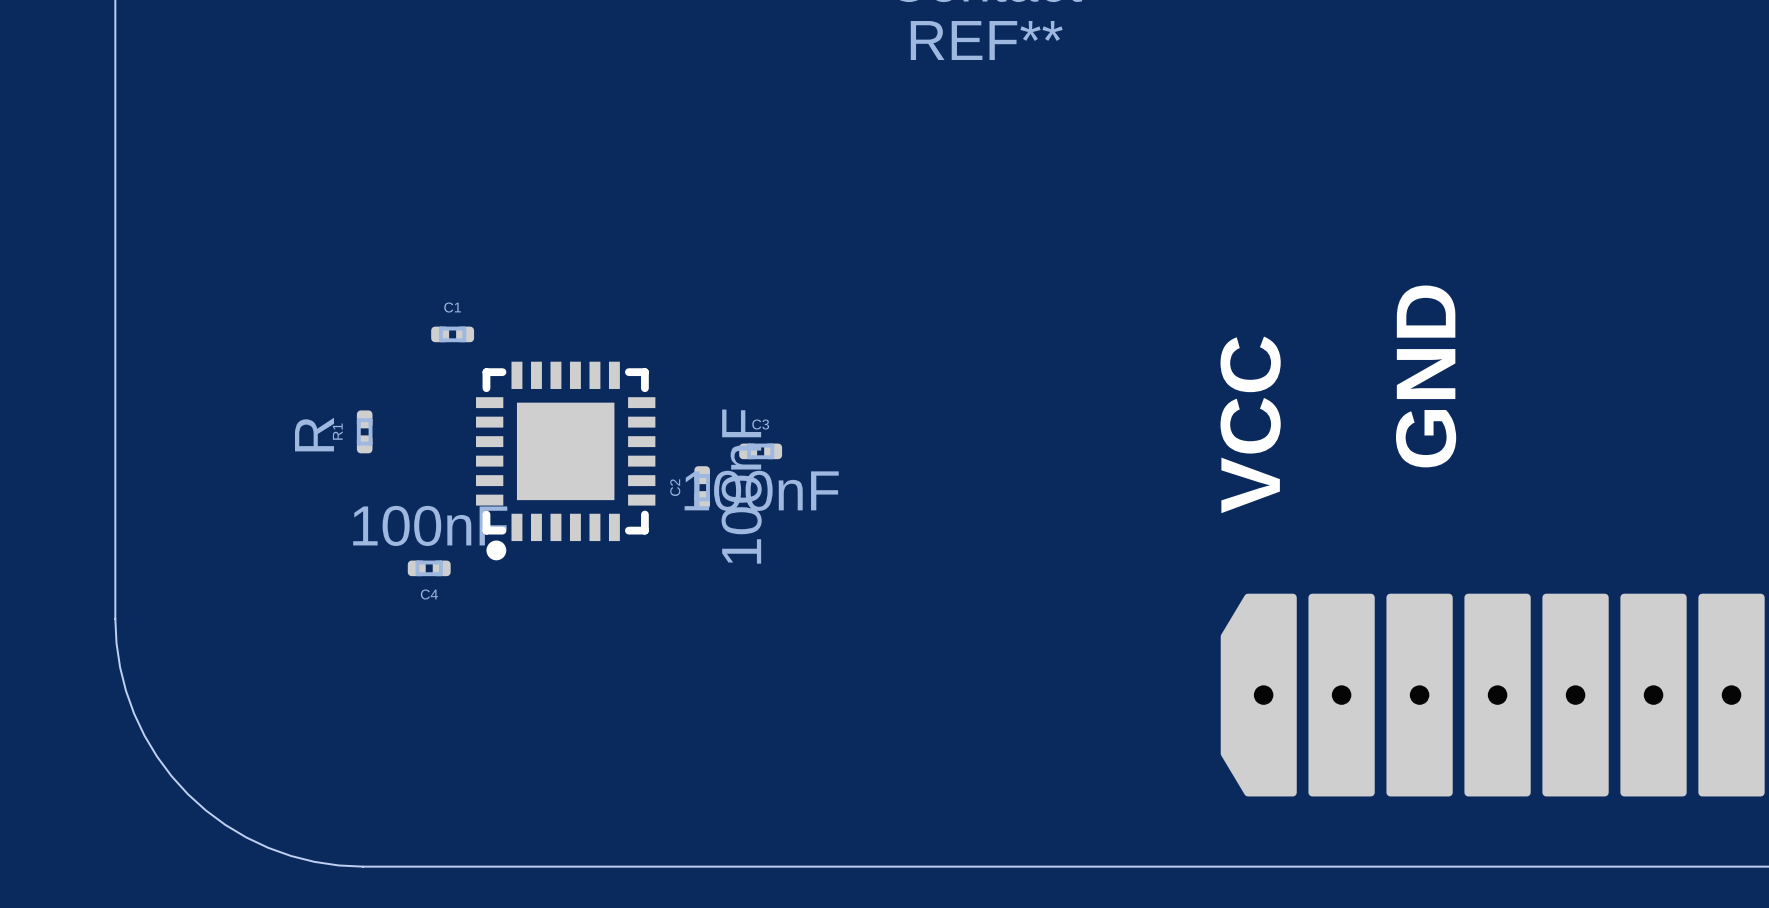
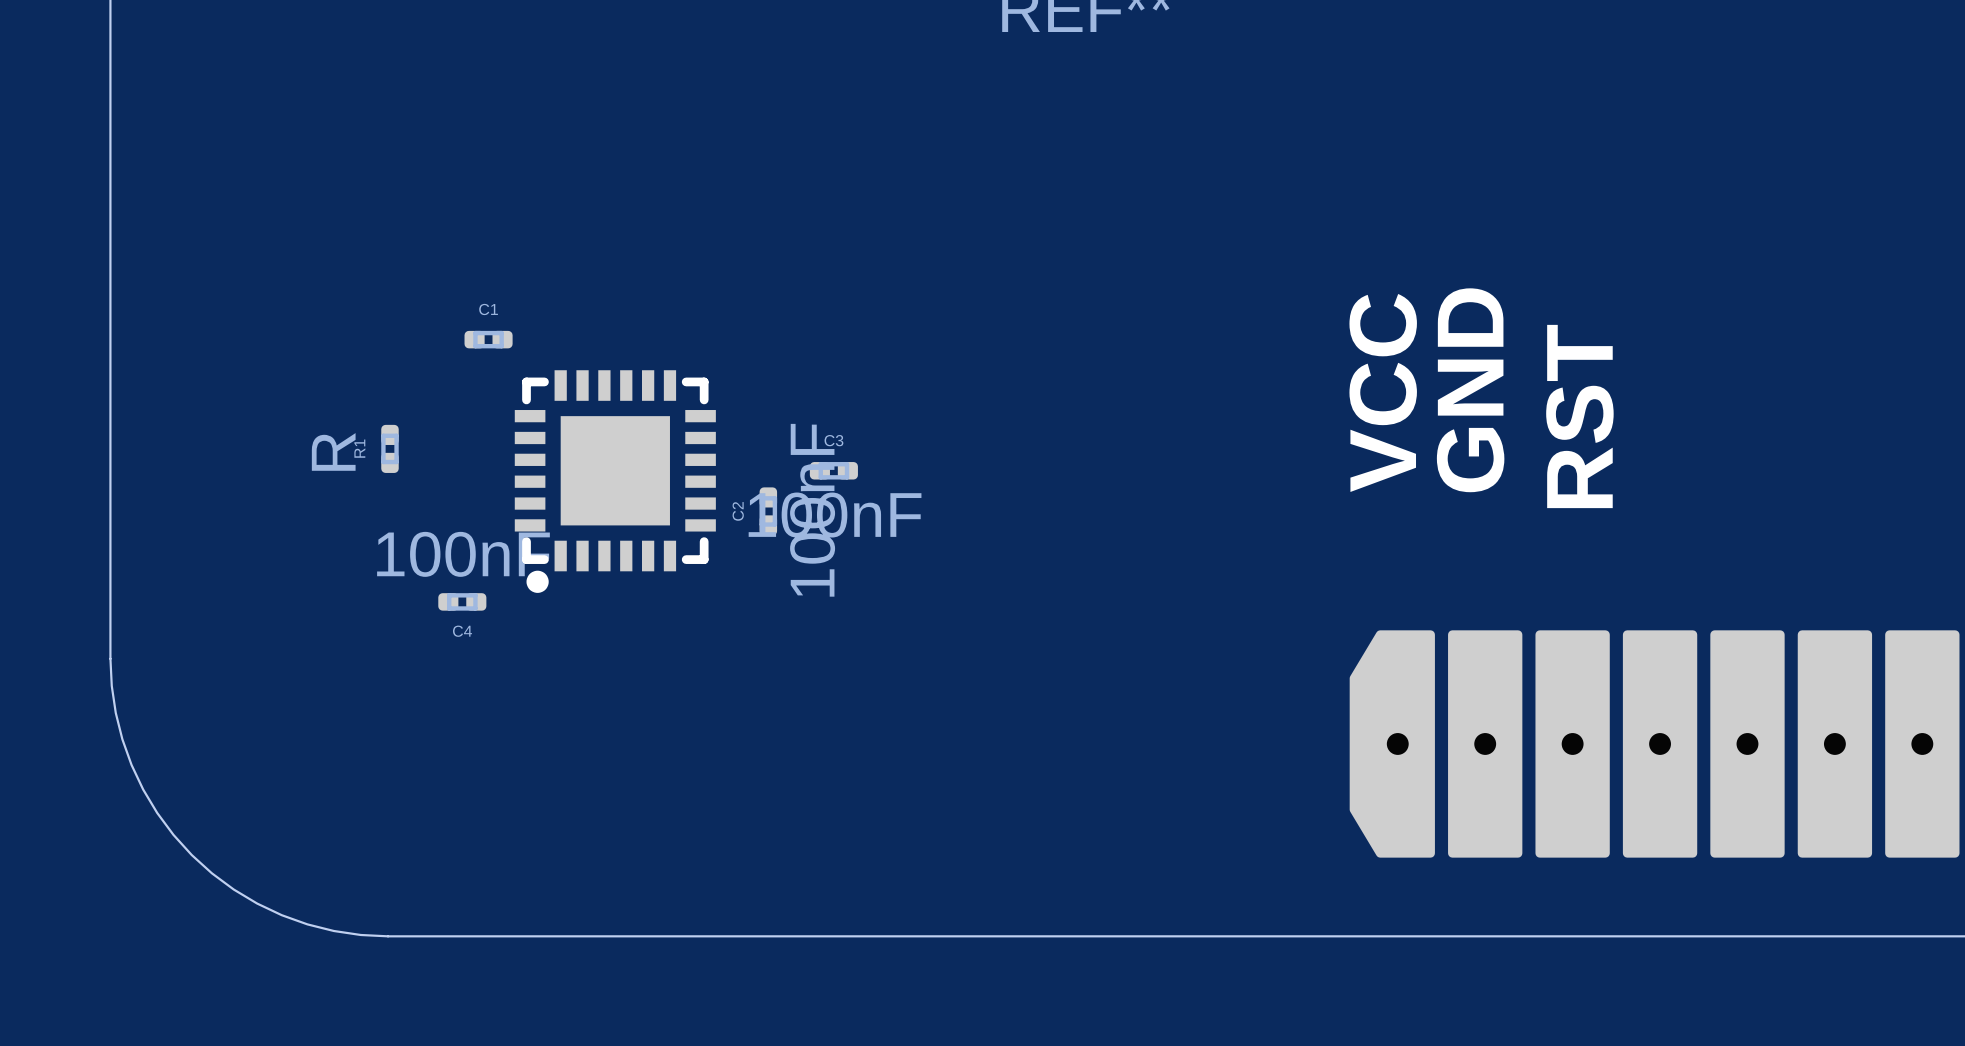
text position: GND (1426, 376) -> GND (1470, 390)
text: none -> RST (1579, 416)
text position: VCC (1250, 424) -> VCC (1383, 392)

